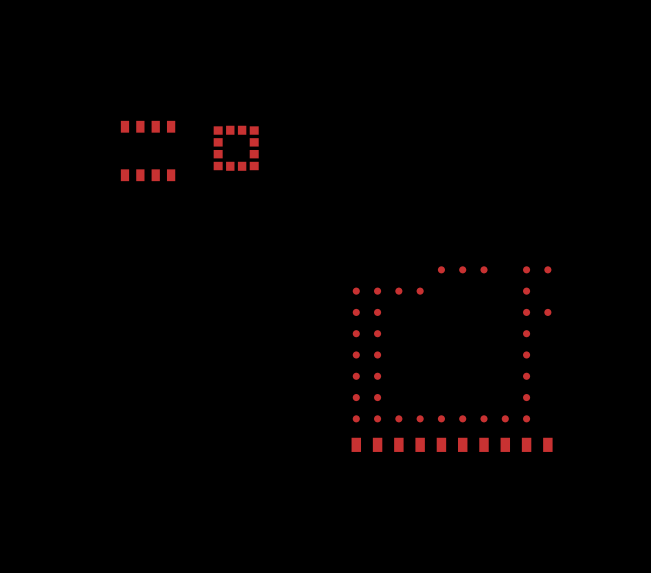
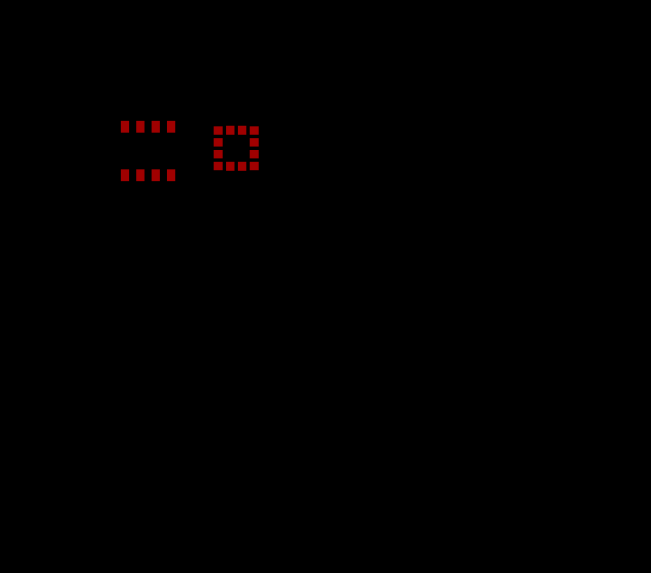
part: (452, 359) -> none

